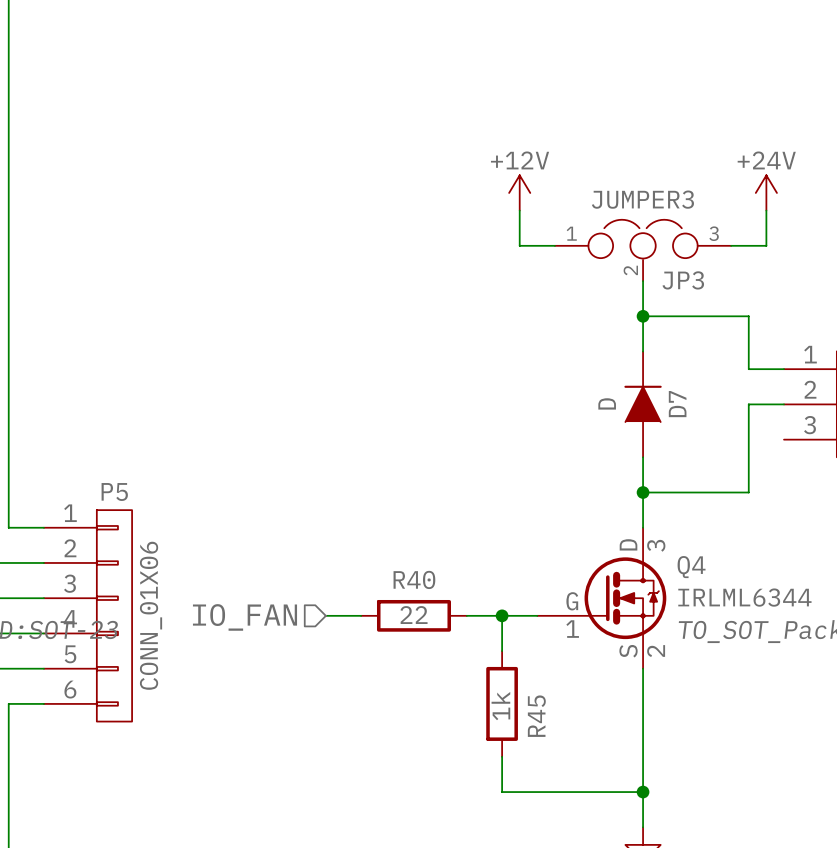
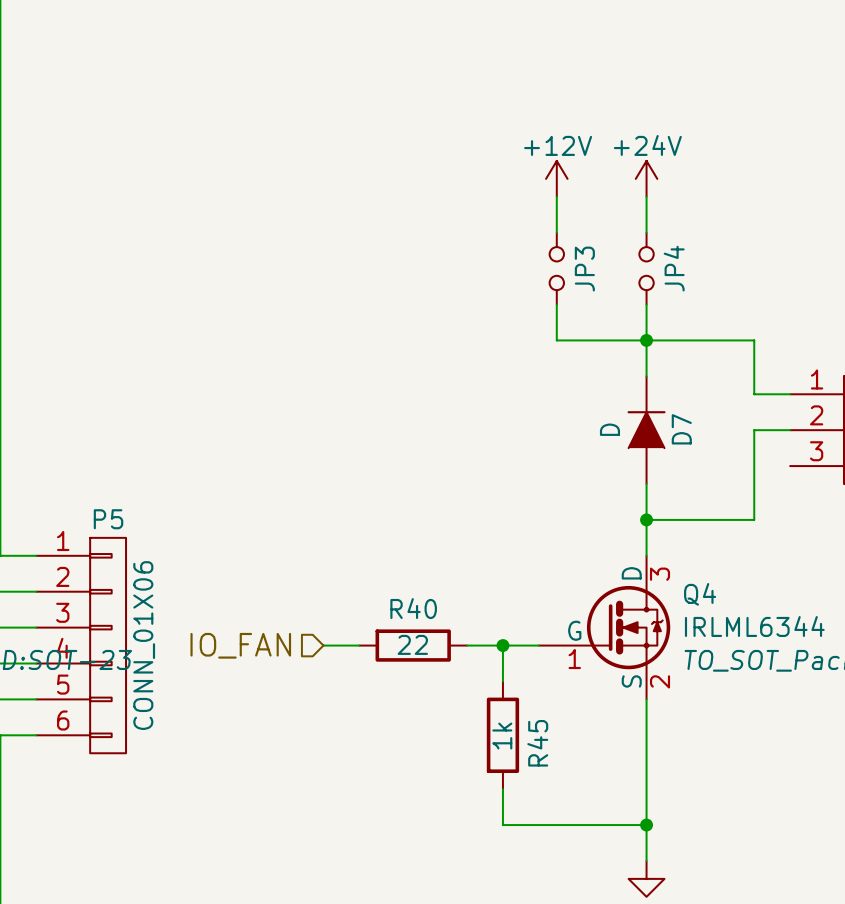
wire: none -> (556, 196) (556, 232)
wire: none -> (646, 196) (646, 232)
power symbol position: +12V (519, 192) -> +12V (556, 178)
power symbol position: +24V (766, 192) -> +24V (646, 178)
JP3 value: JUMPER3 (642, 199) -> none
wire: (519, 210) (519, 245) (554, 245) -> none
wire: (766, 210) (766, 245) (731, 245) -> none
JP3 symbol: [554, 219, 732, 282] -> [549, 232, 564, 305]
JP4: none -> (646, 268)
JP3 name position: JP3 (683, 280) -> JP3 (584, 269)
wire: none -> (556, 304) (556, 340) (646, 340)

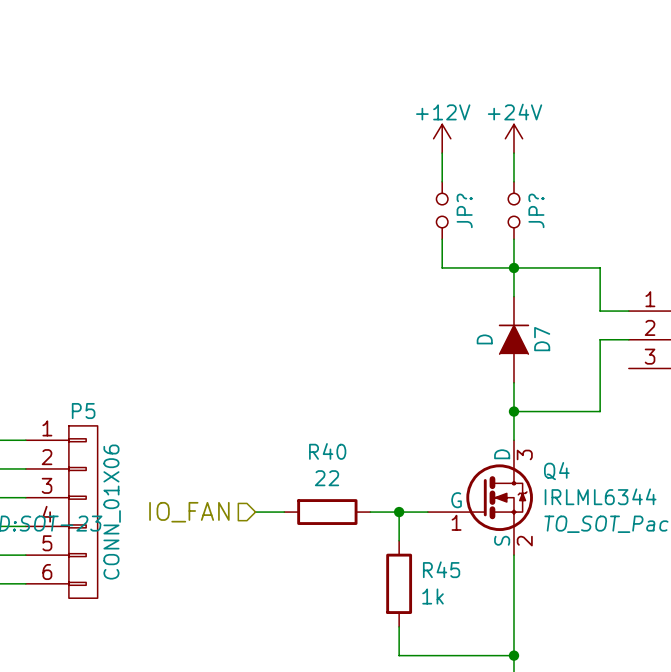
JP4 name: JP4 (674, 268) -> JP? (536, 210)
JP3 name: JP3 (584, 269) -> JP? (464, 210)
R40 name position: R40 (413, 608) -> R40 (327, 451)
R40 value position: 22 (412, 644) -> 22 (327, 478)
R45 value rotation: 0° (502, 736) -> 90° clockwise (433, 596)
R45 value position: 1k (502, 736) -> 1k (433, 596)
R45 name rotation: 0° (537, 743) -> 90° clockwise (441, 569)

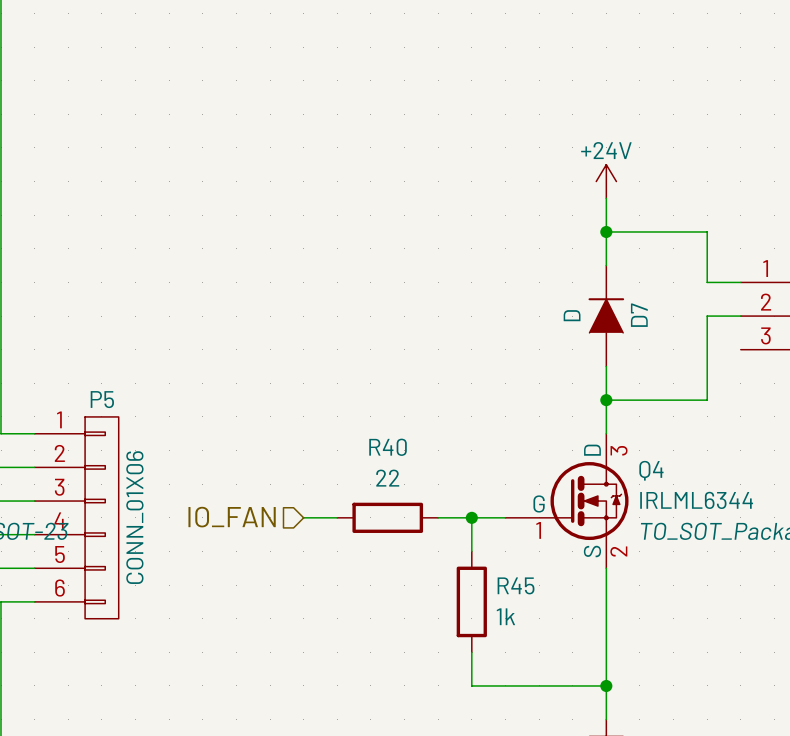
power symbol: +12V (442, 138) -> none
power symbol position: +24V (513, 138) -> +24V (606, 181)
wire: (442, 153) (442, 181) -> none
wire: (513, 153) (513, 181) -> none
JP?: (442, 210) -> none
JP?: (513, 210) -> none
wire: (442, 239) (442, 267) (513, 267) -> none

